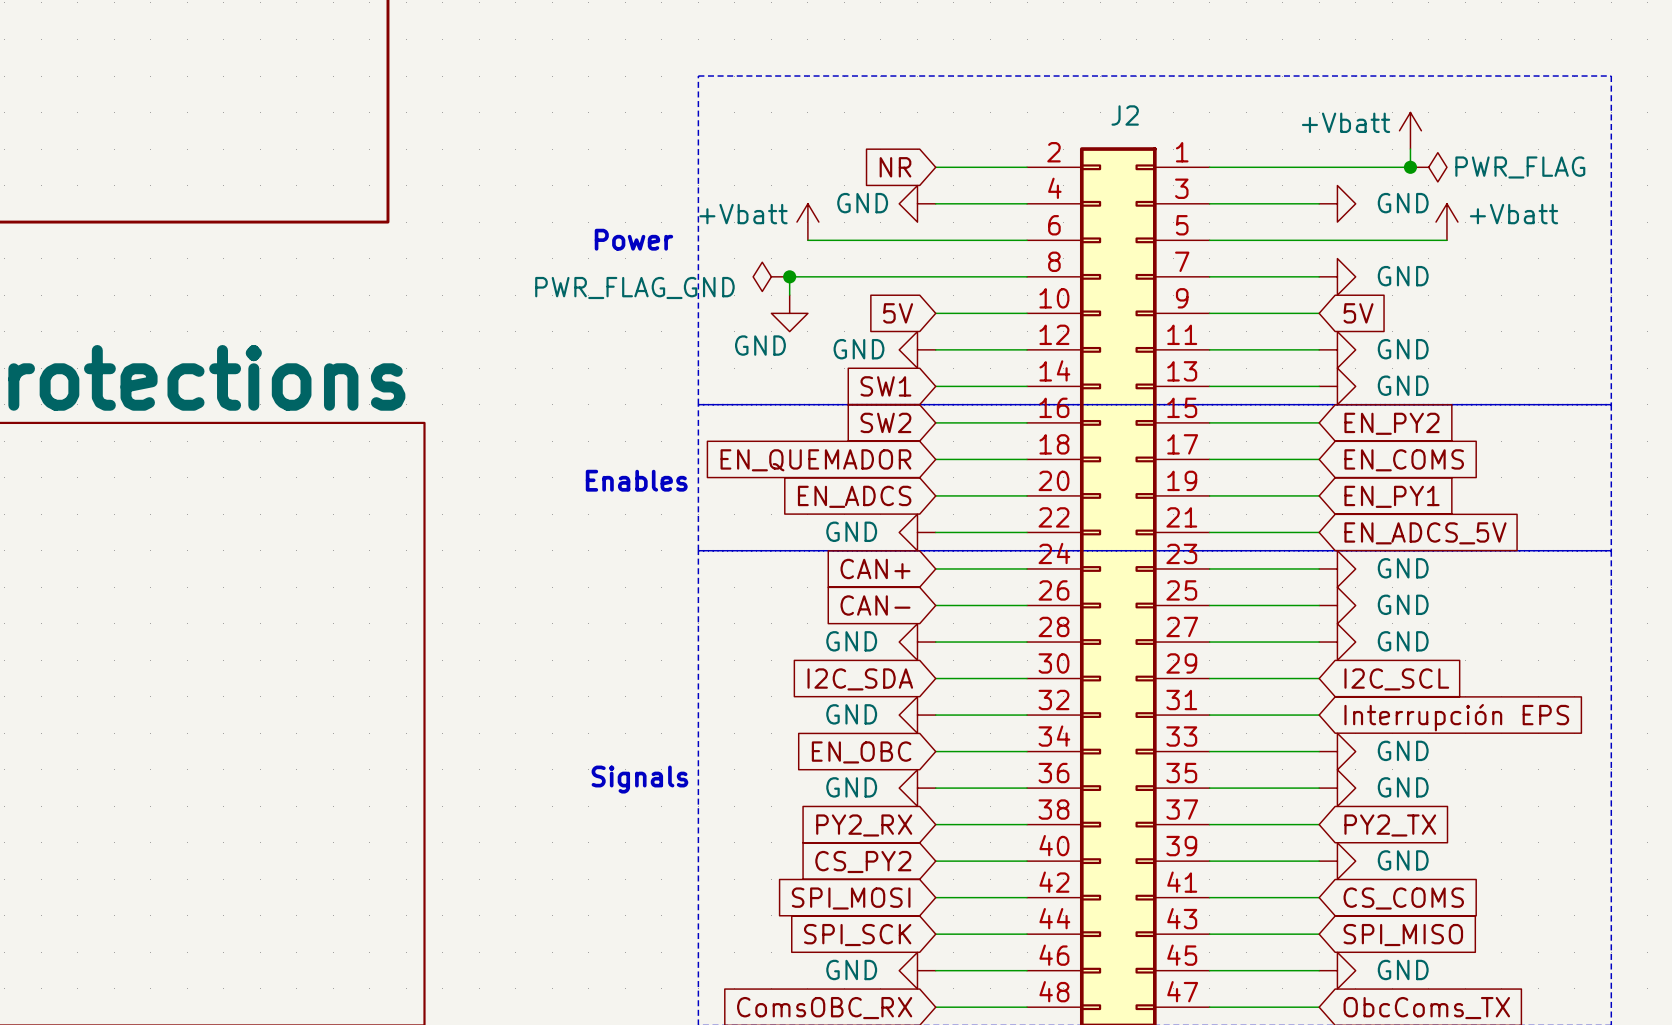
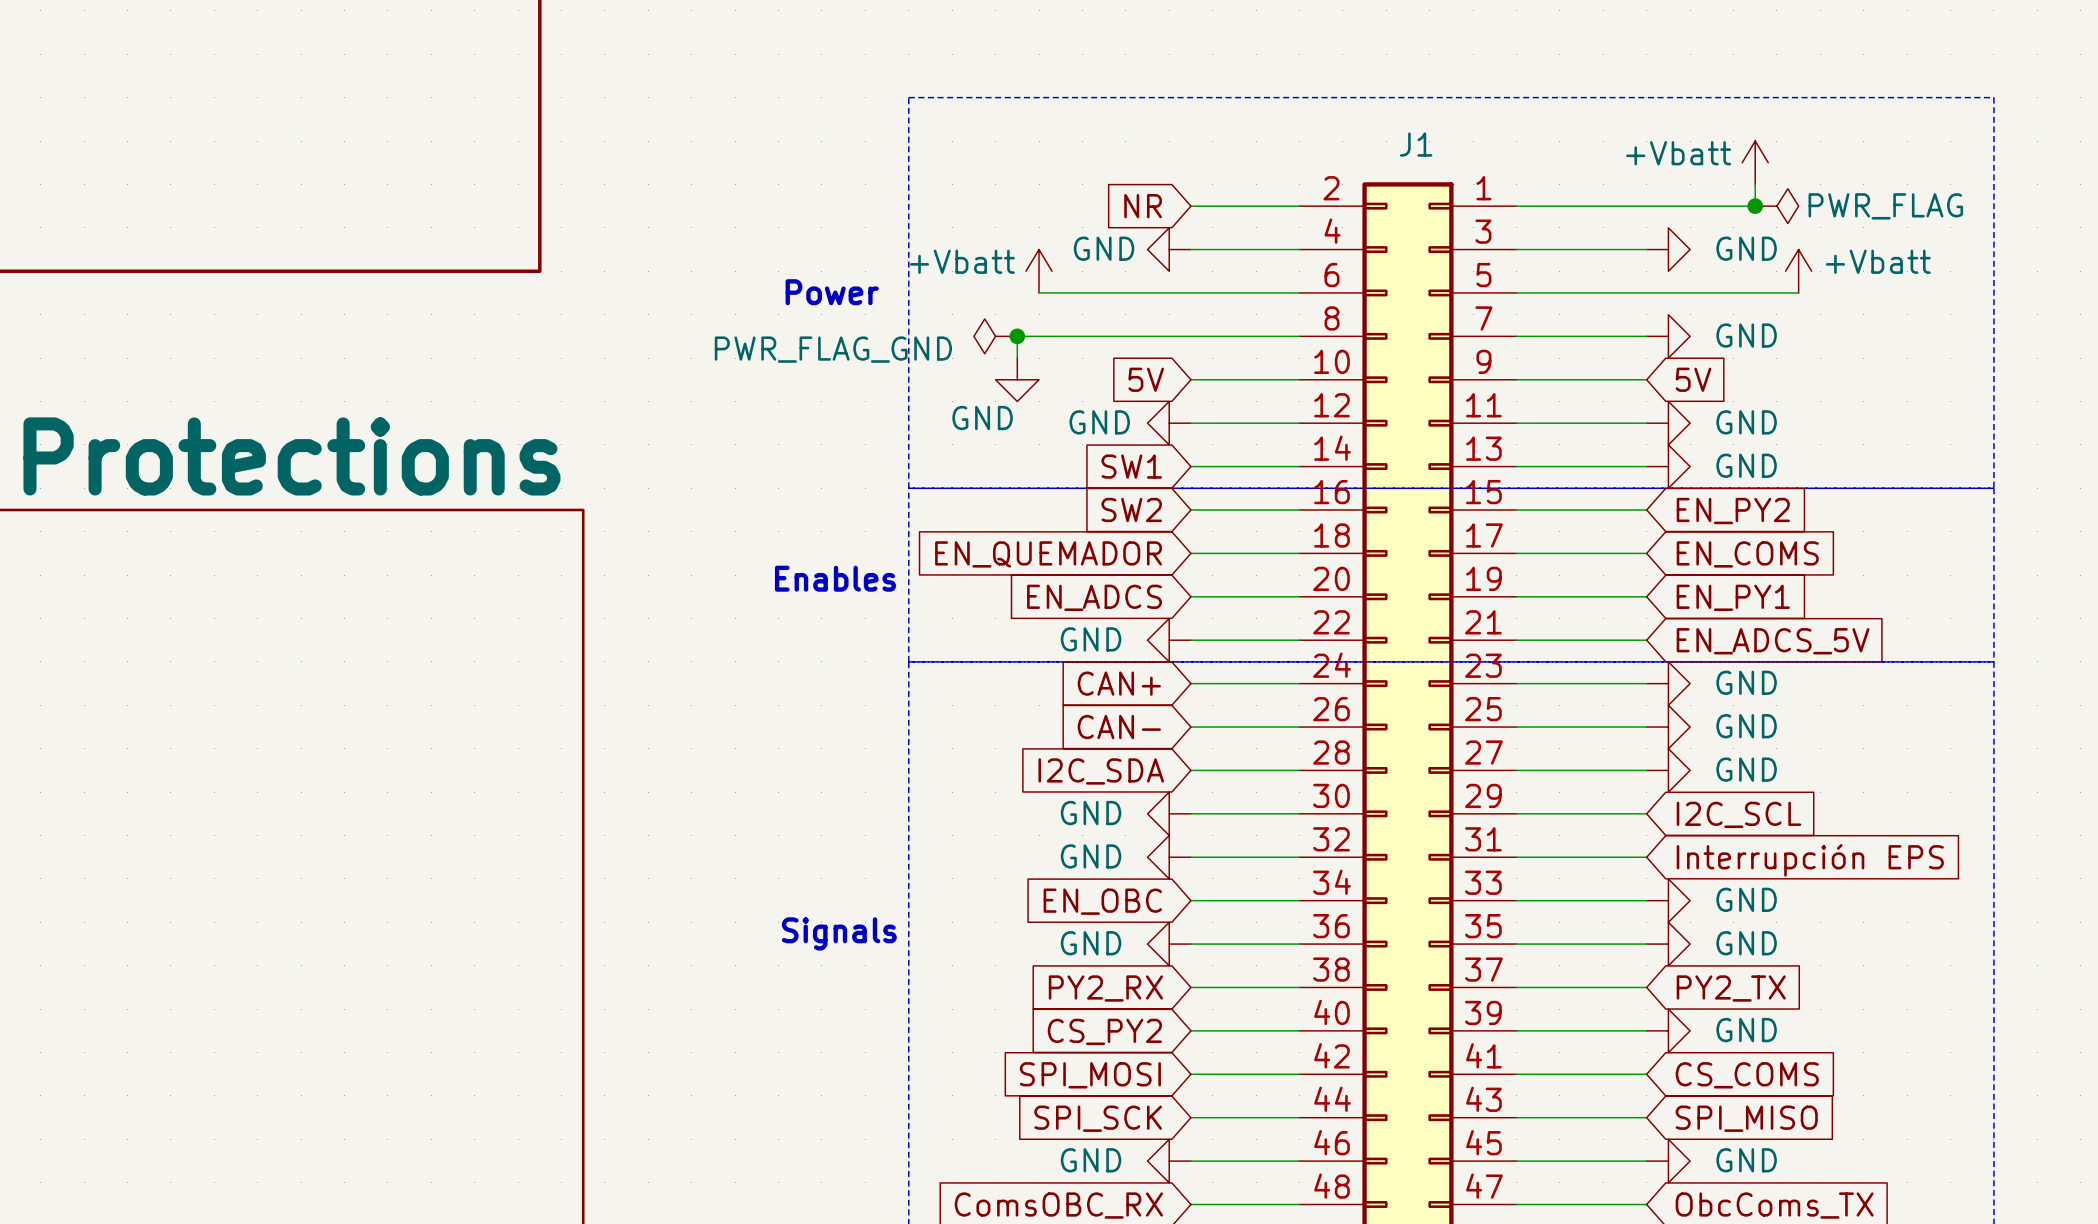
J2 name: J2 (1125, 115) -> J1 (1416, 144)
power symbol position: GND (917, 642) -> GND (1169, 813)
global label position: I2C_SDA (860, 679) -> I2C_SDA (1101, 771)

